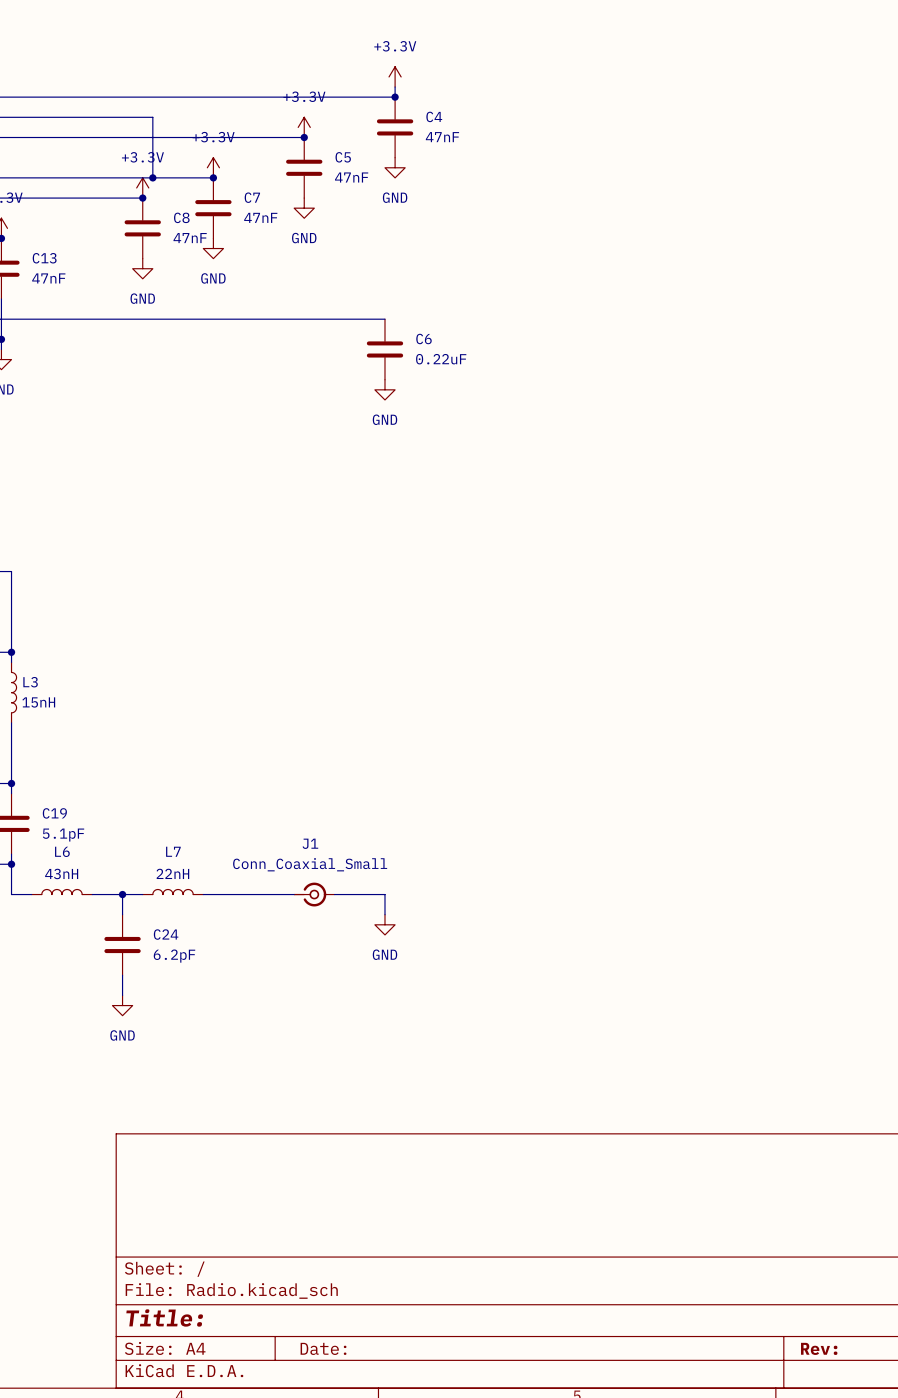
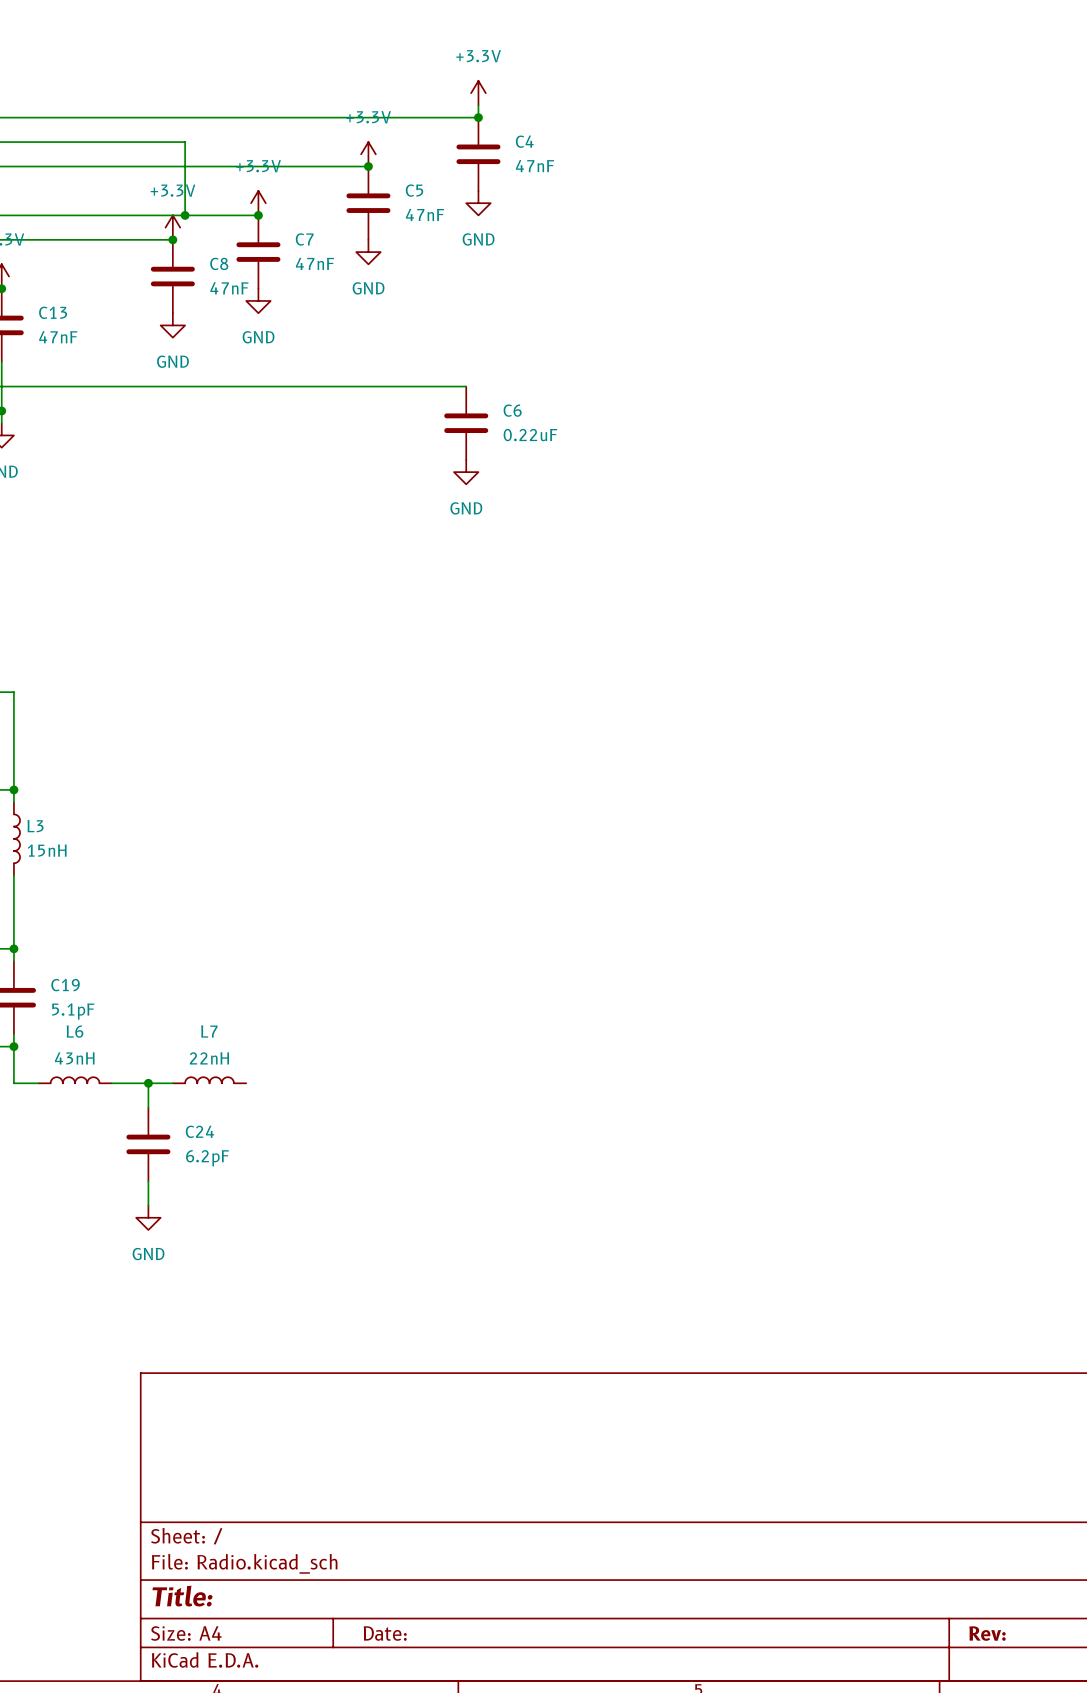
wire: (203, 894) (294, 894) -> none
J1: Conn_Coaxial_Small (314, 894) -> none
wire: (334, 894) (384, 894) (384, 914) -> none
power symbol: GND (384, 924) -> none

